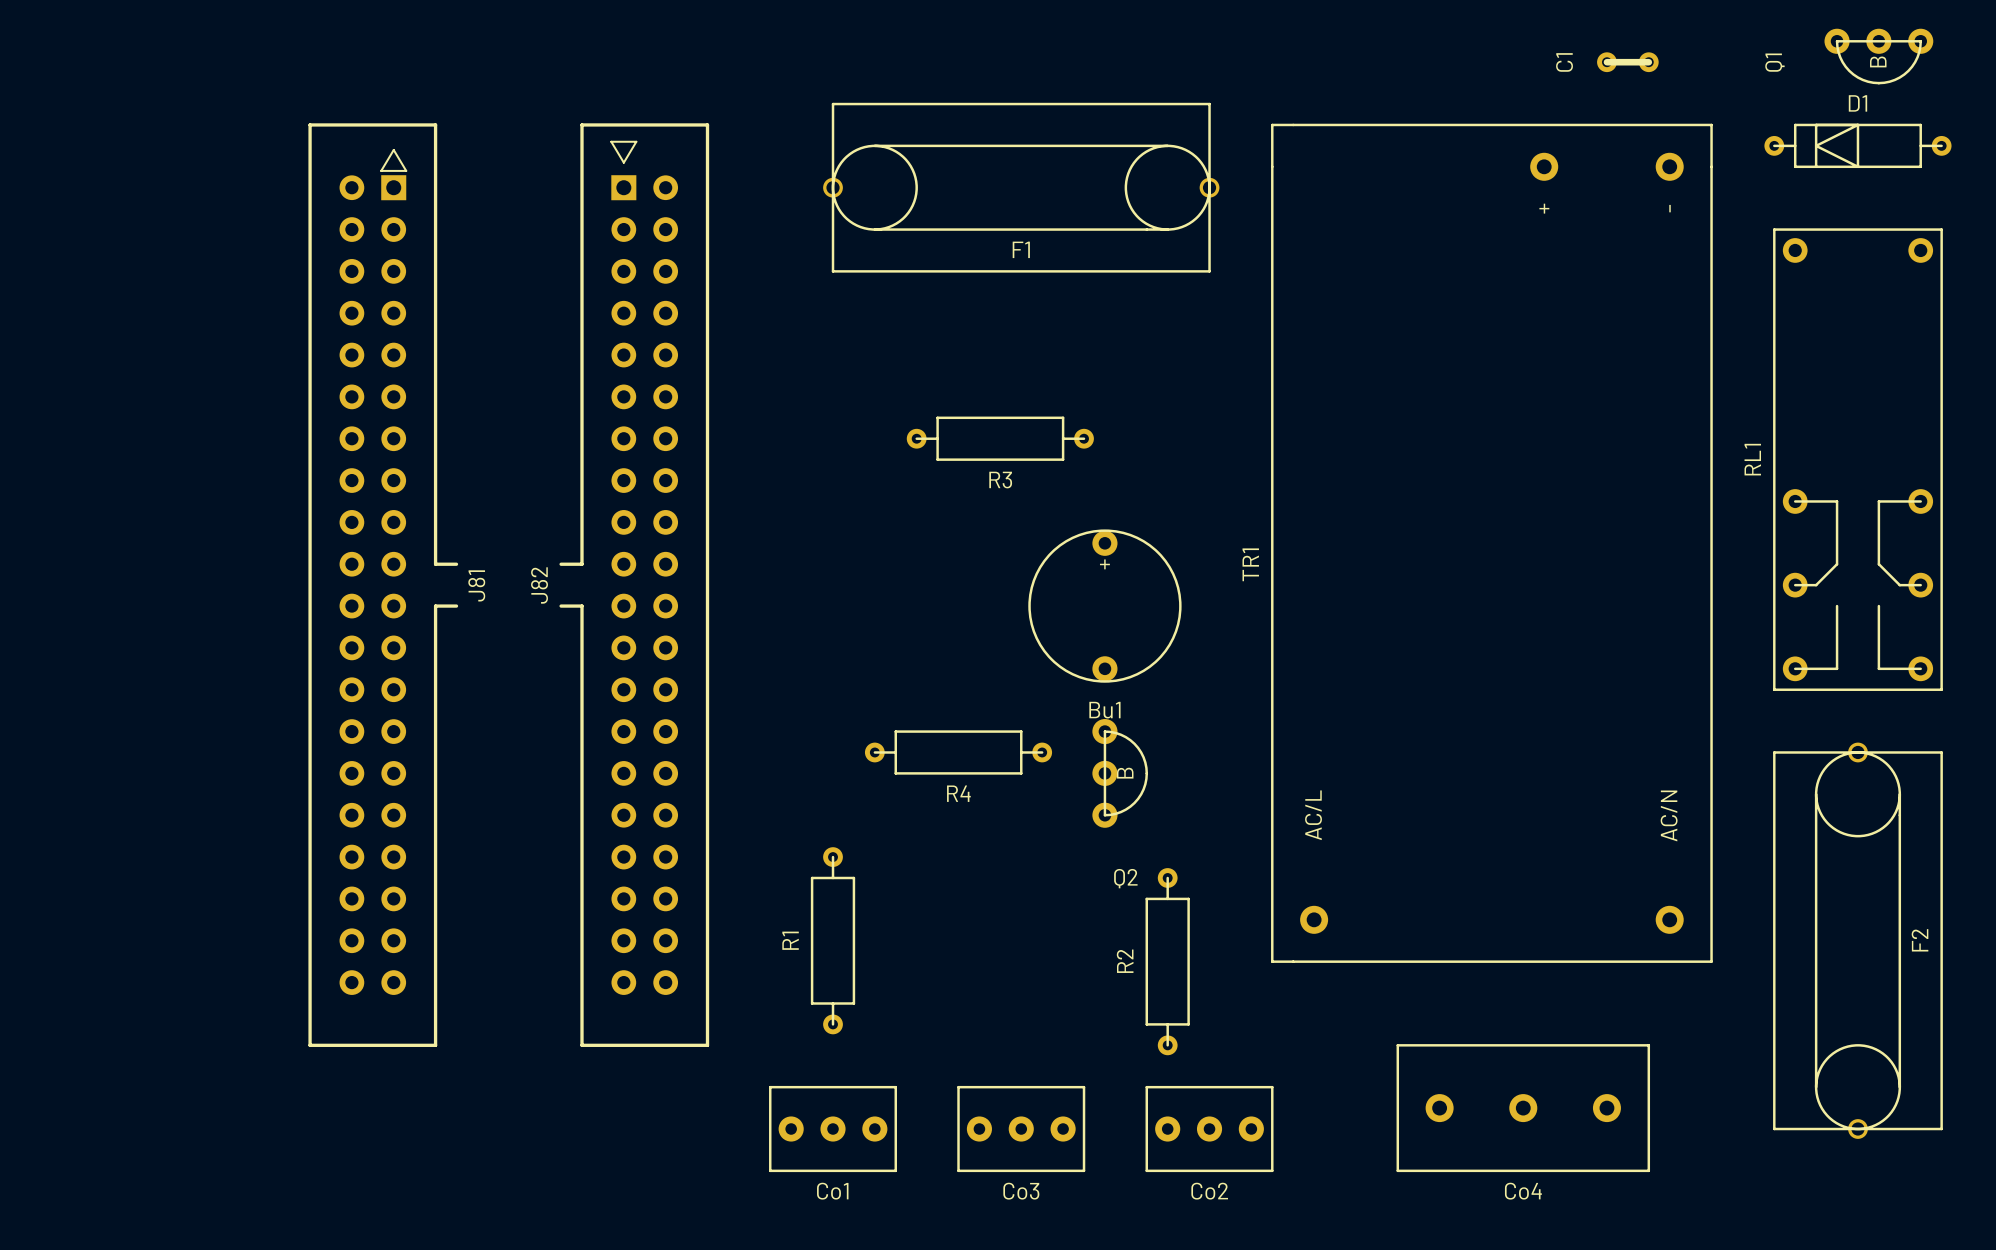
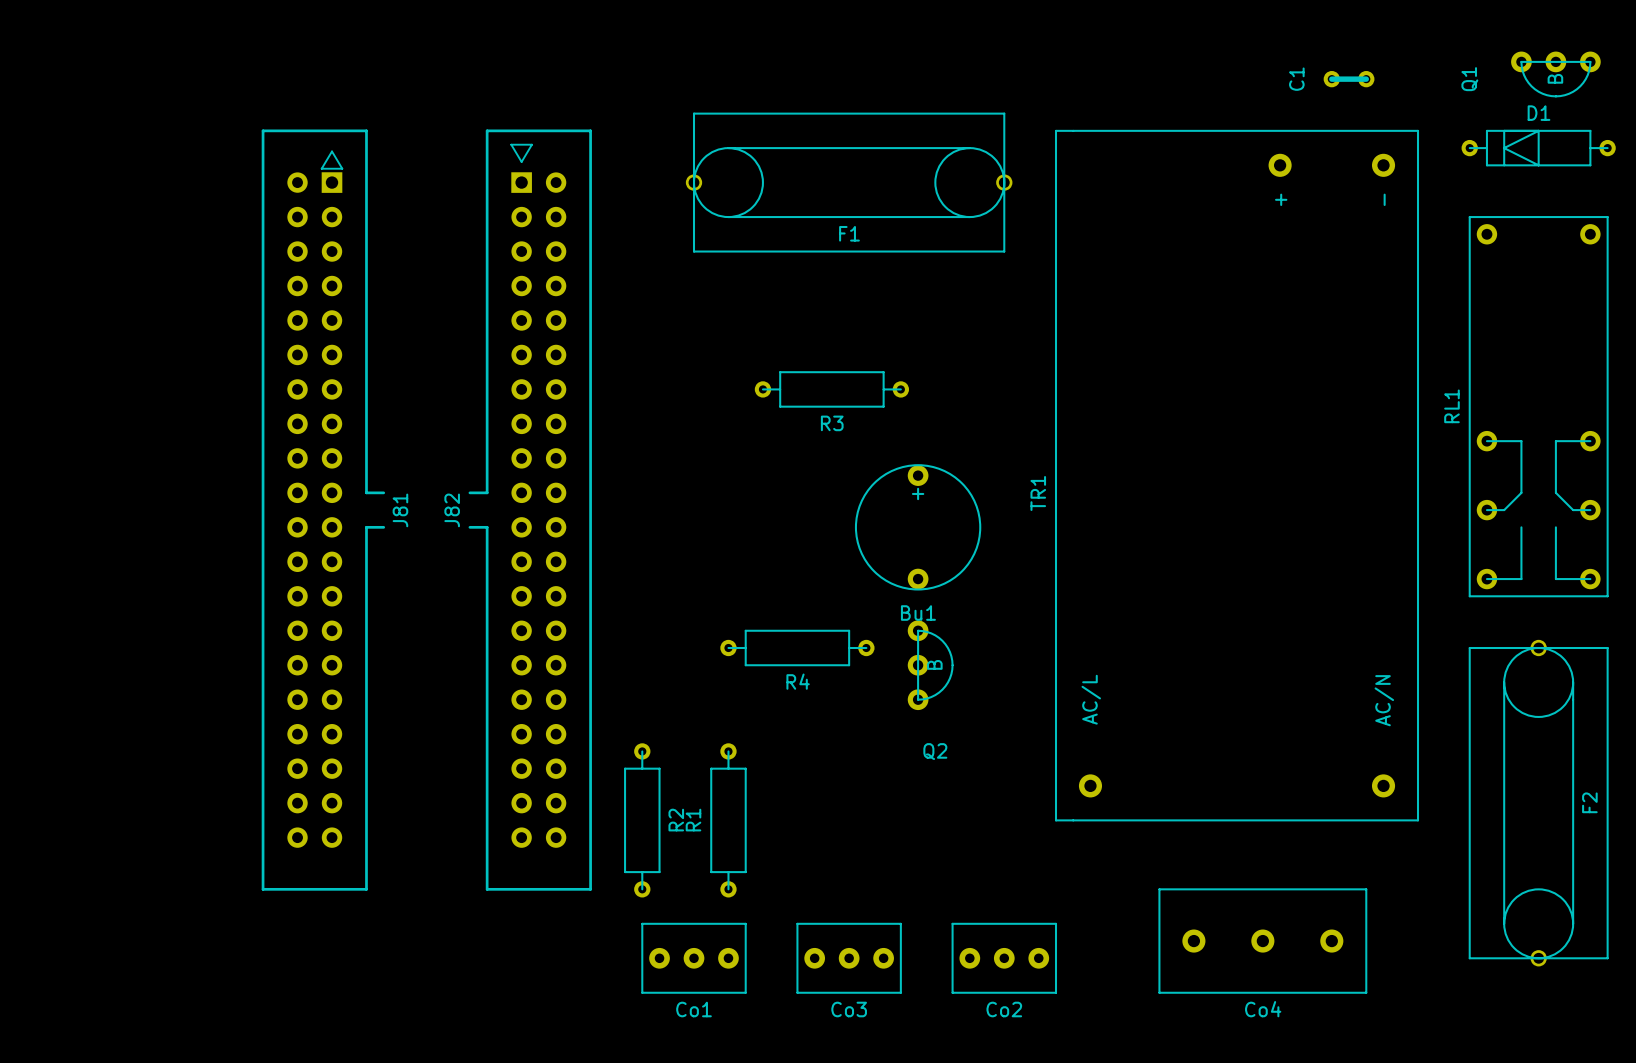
R1 position: (833, 940) -> (728, 820)
R2 name position: R2 (1125, 961) -> R2 (676, 820)
R2 position: (1167, 961) -> (642, 820)

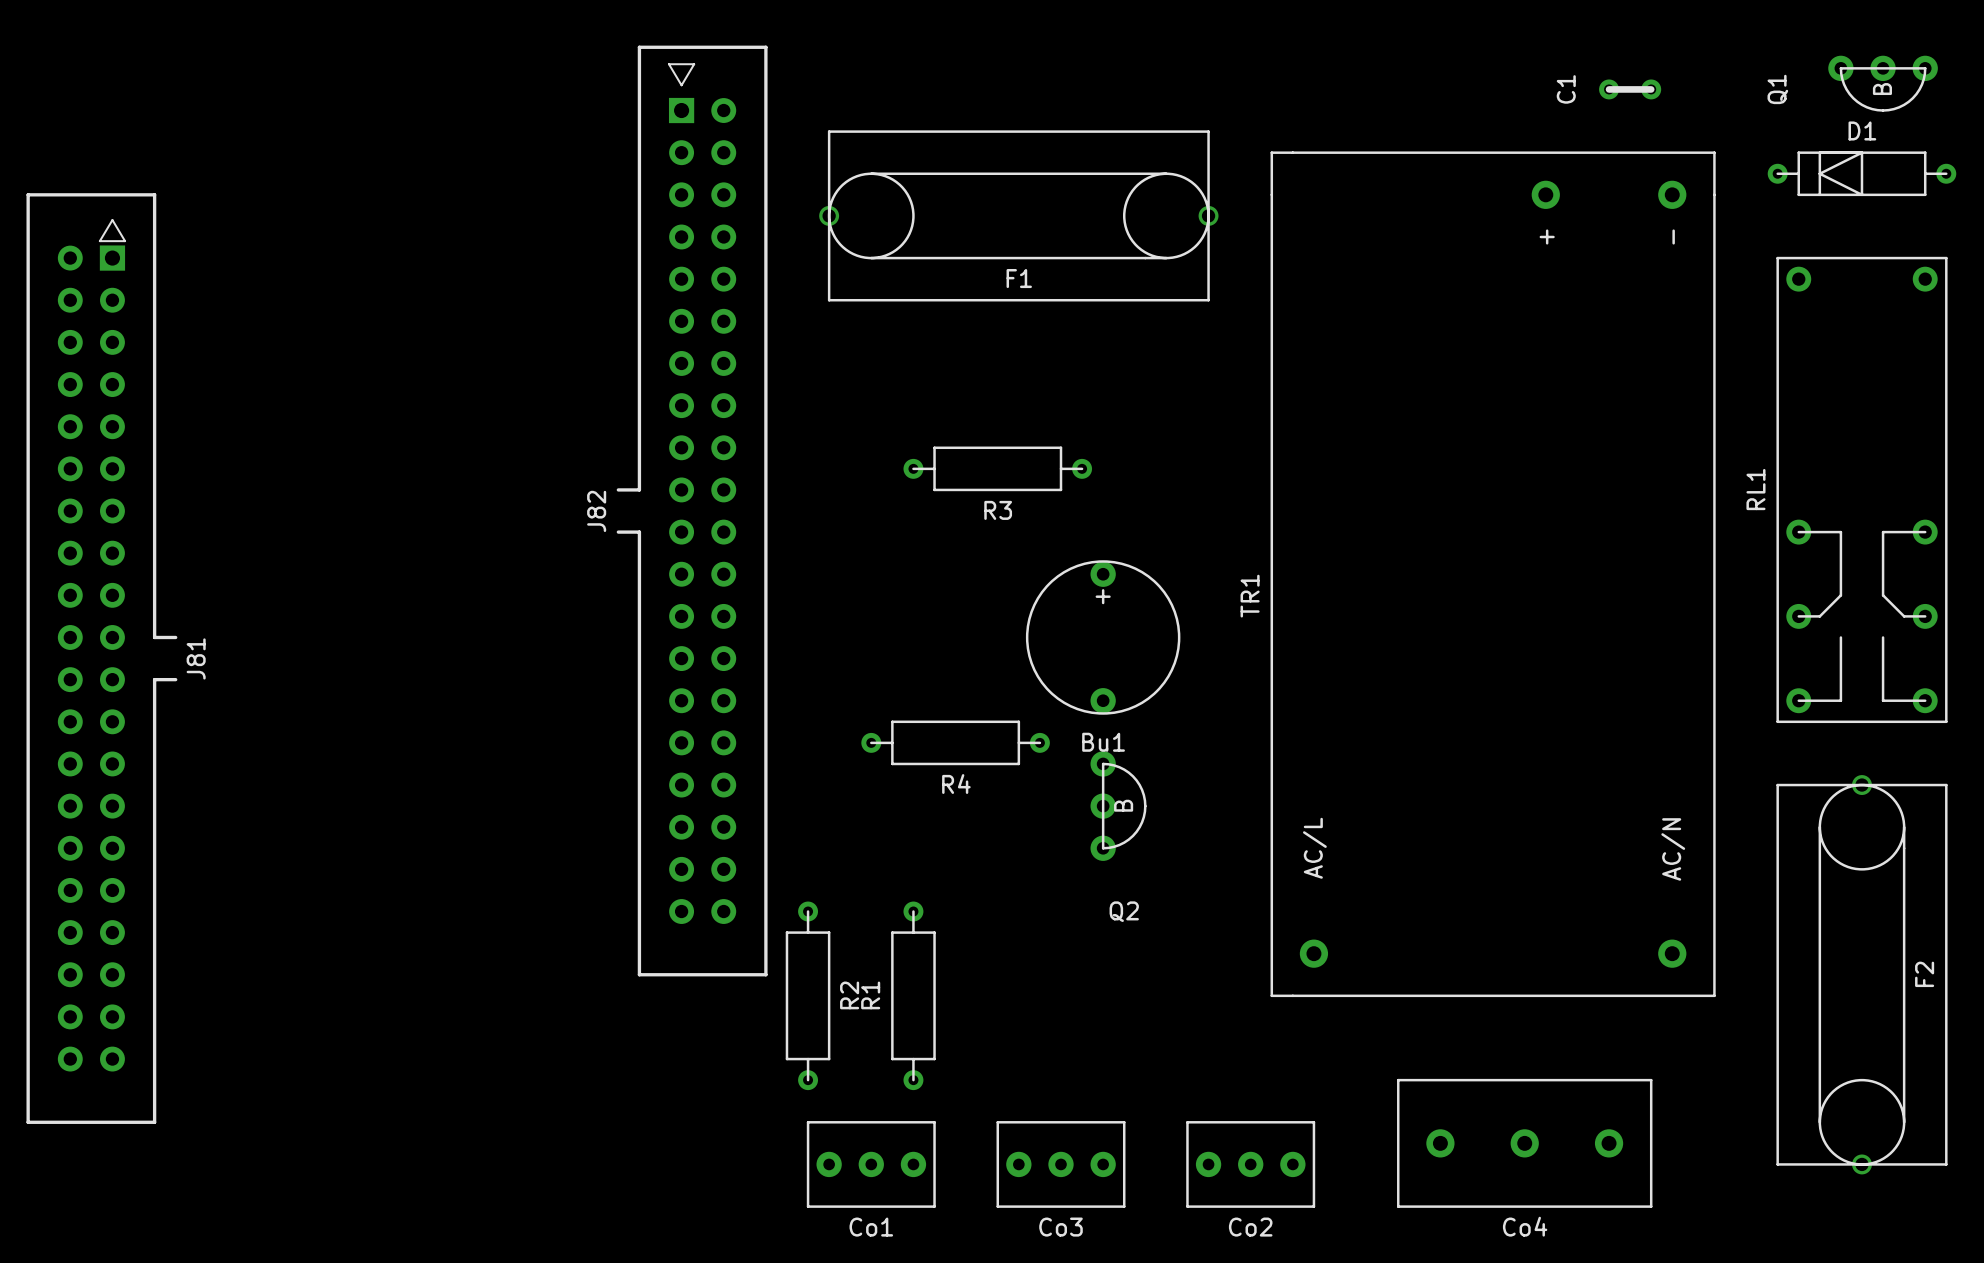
J81 position: (323, 510) -> (101, 658)
J82 position: (530, 510) -> (692, 511)
R4 position: (797, 648) -> (955, 742)
R2 position: (642, 820) -> (808, 995)
R1 position: (728, 820) -> (913, 995)
Co1 position: (694, 958) -> (871, 1164)
Co3 position: (849, 958) -> (1061, 1164)
Co2 position: (1004, 958) -> (1250, 1164)

